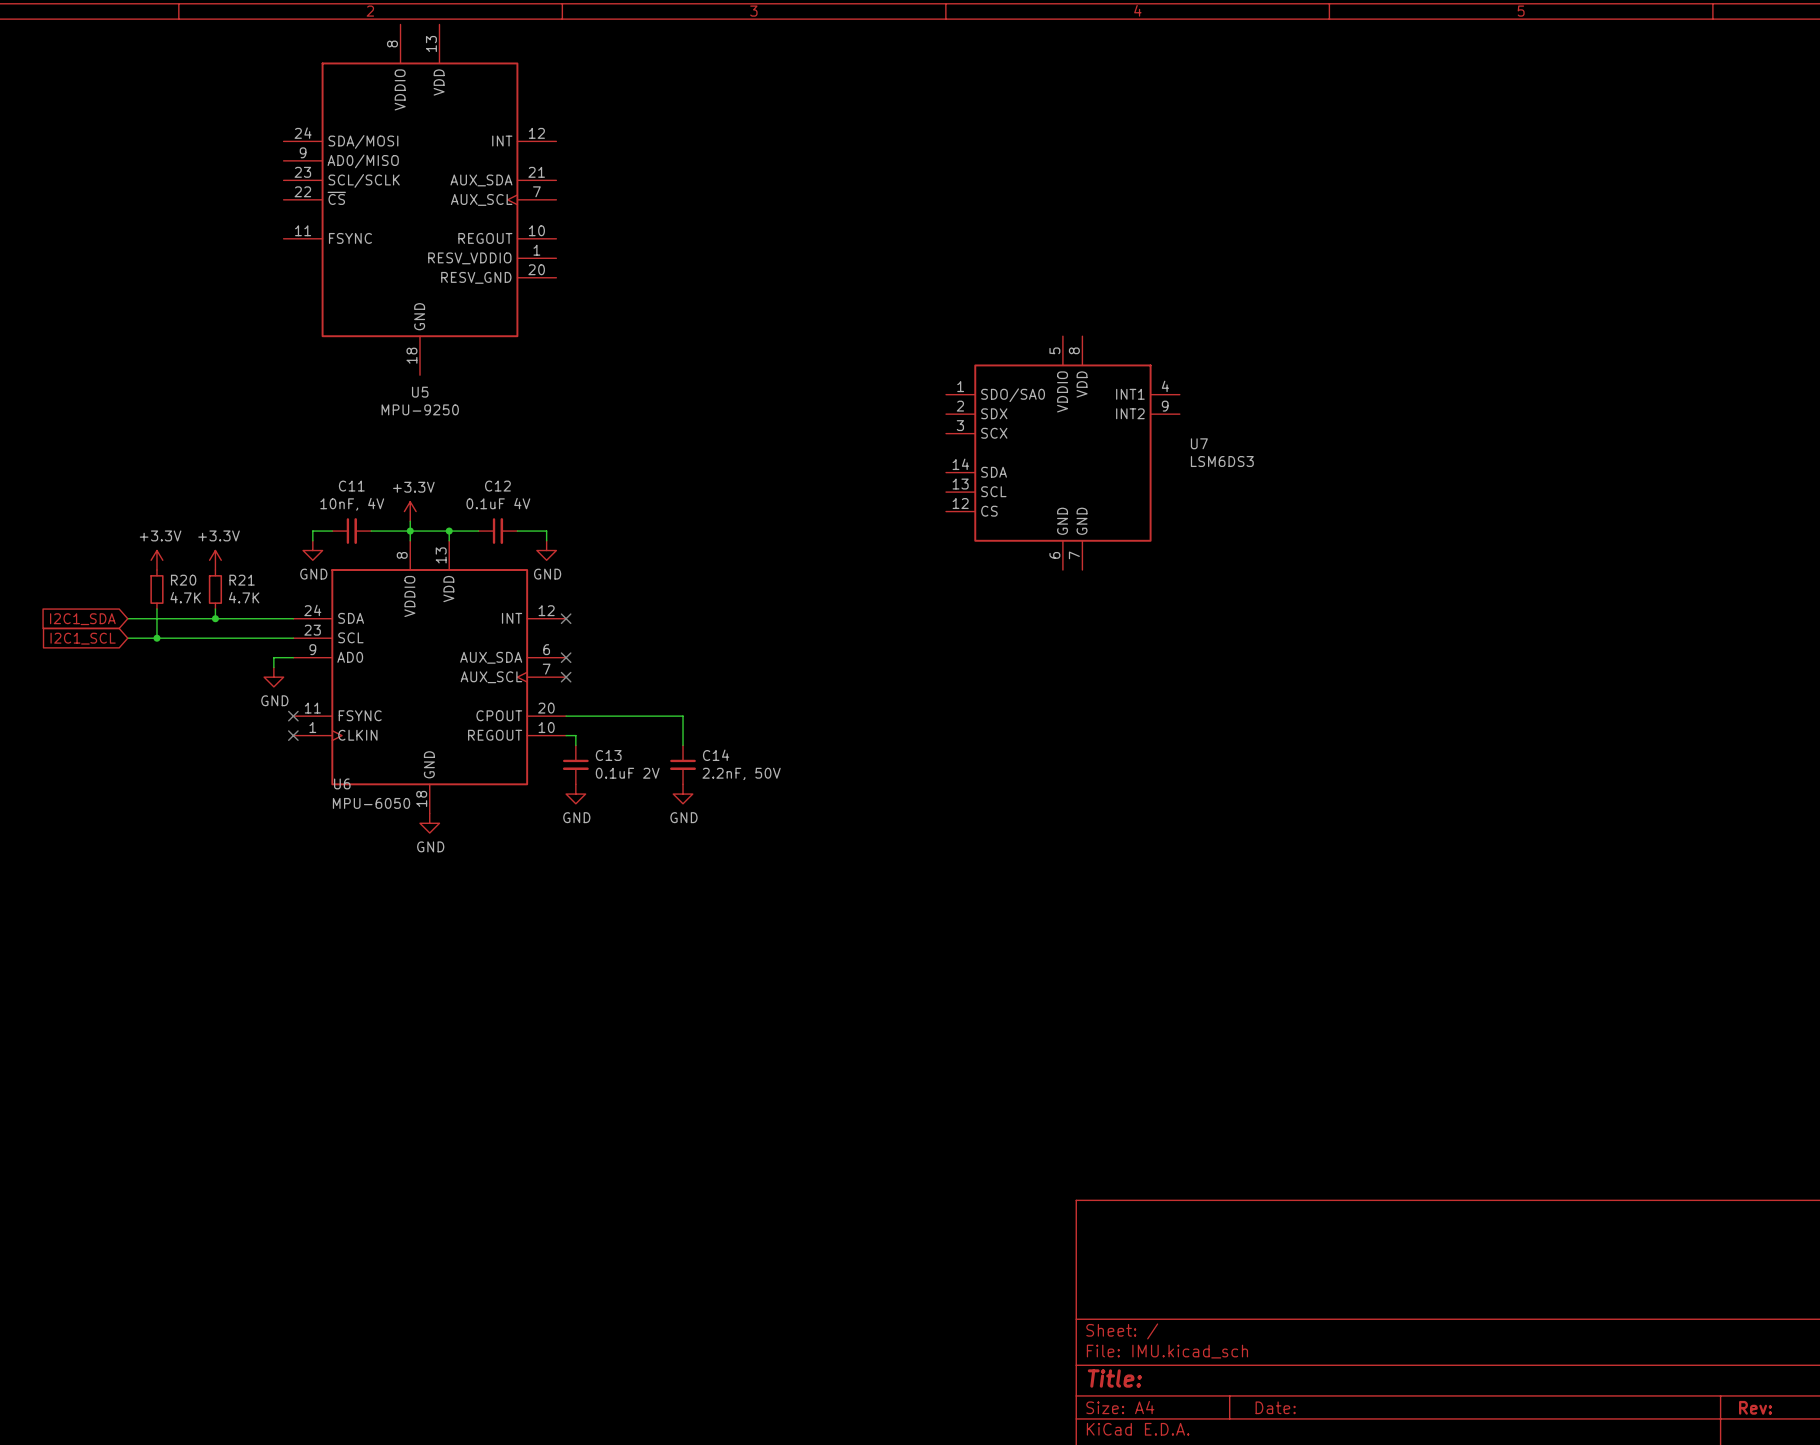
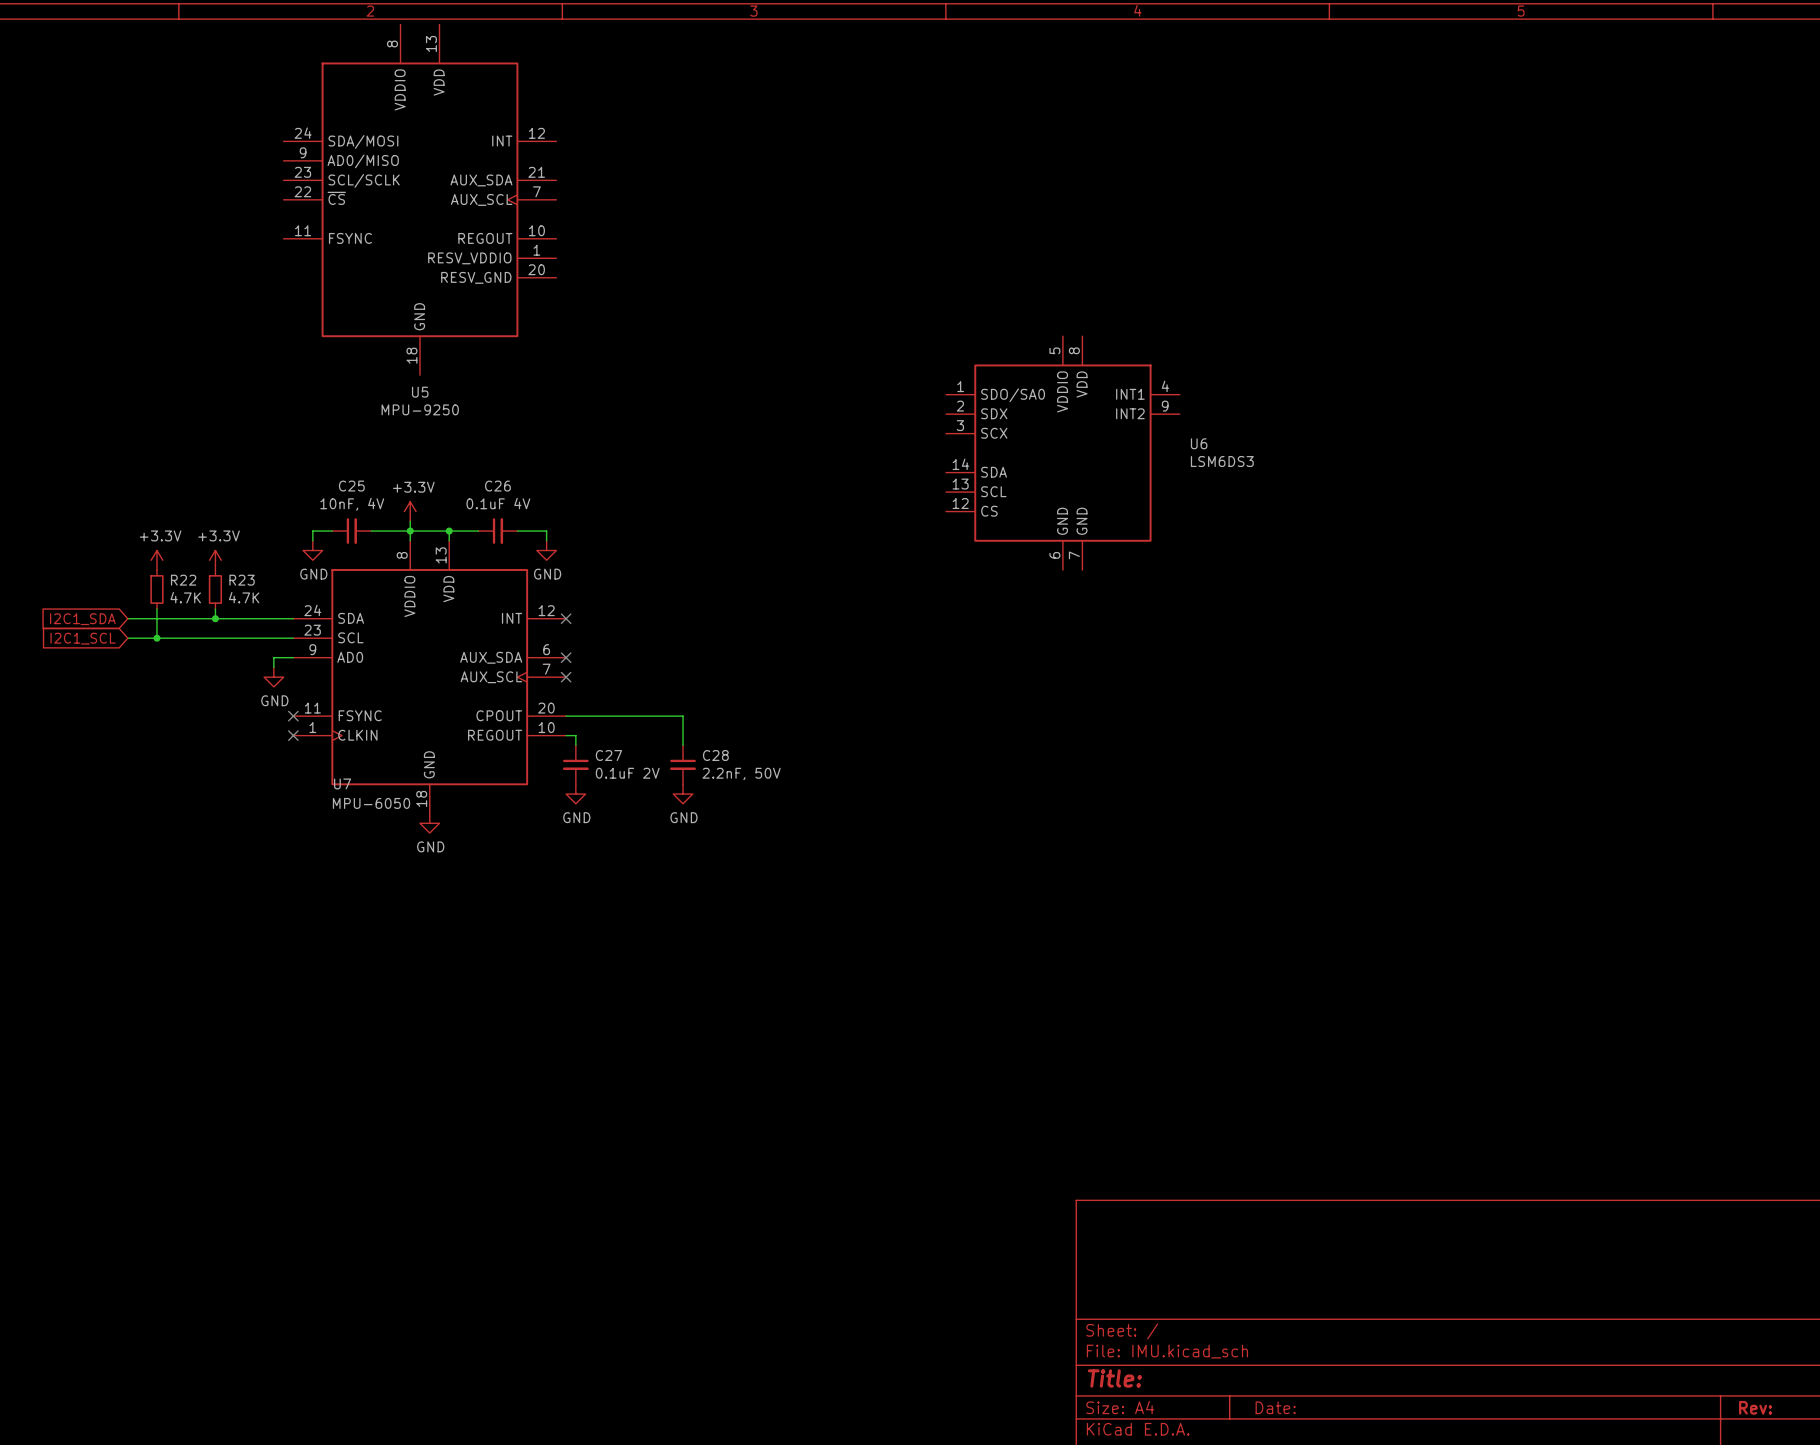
U7 name: U7 (1199, 443) -> U6 (1199, 443)
C11 name: C11 (351, 486) -> C25 (351, 486)
C12 name: C12 (497, 486) -> C26 (497, 486)
R20 name: R20 (183, 580) -> R22 (183, 580)
R21 name: R21 (242, 580) -> R23 (242, 580)
C13 name: C13 (608, 755) -> C27 (608, 755)
C14 name: C14 (716, 755) -> C28 (715, 755)
U6 name: U6 (342, 783) -> U7 (342, 783)

